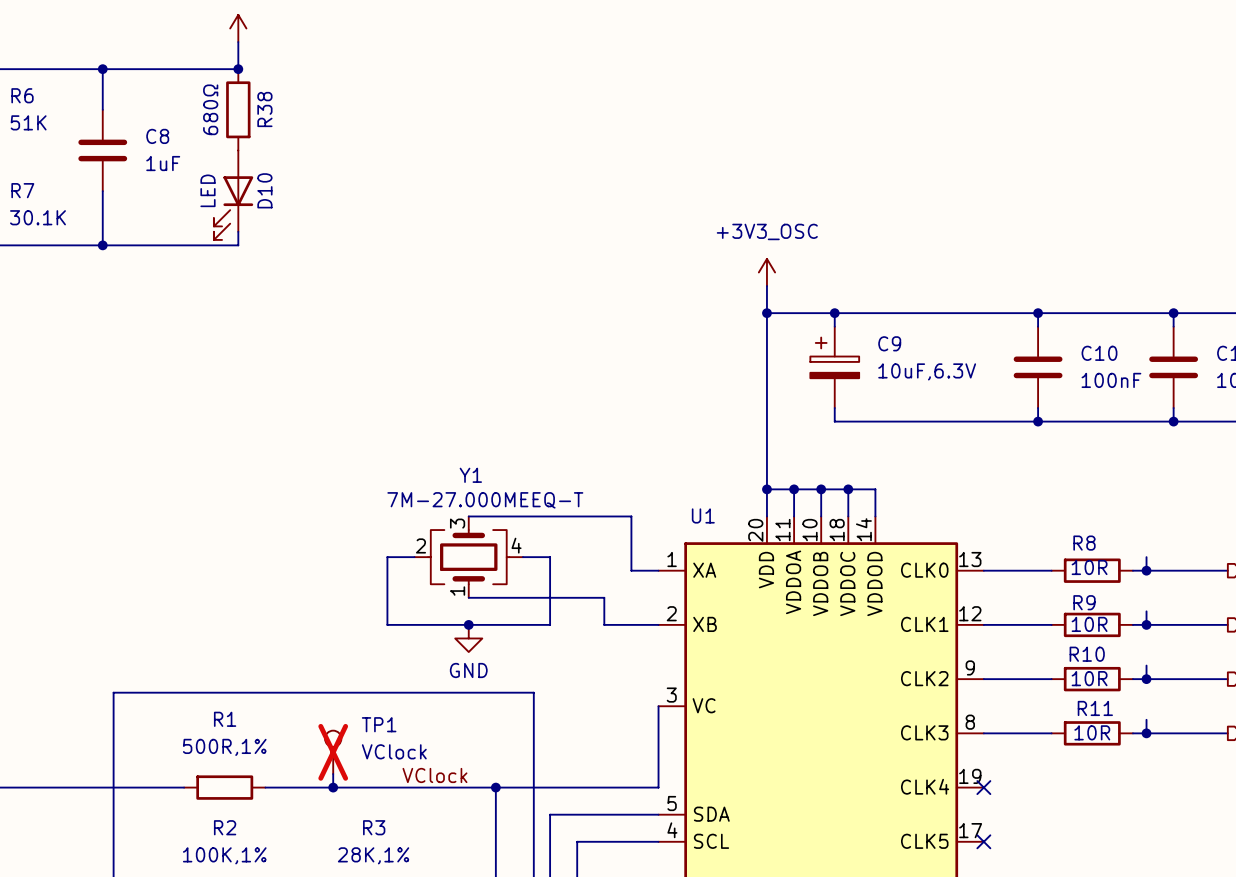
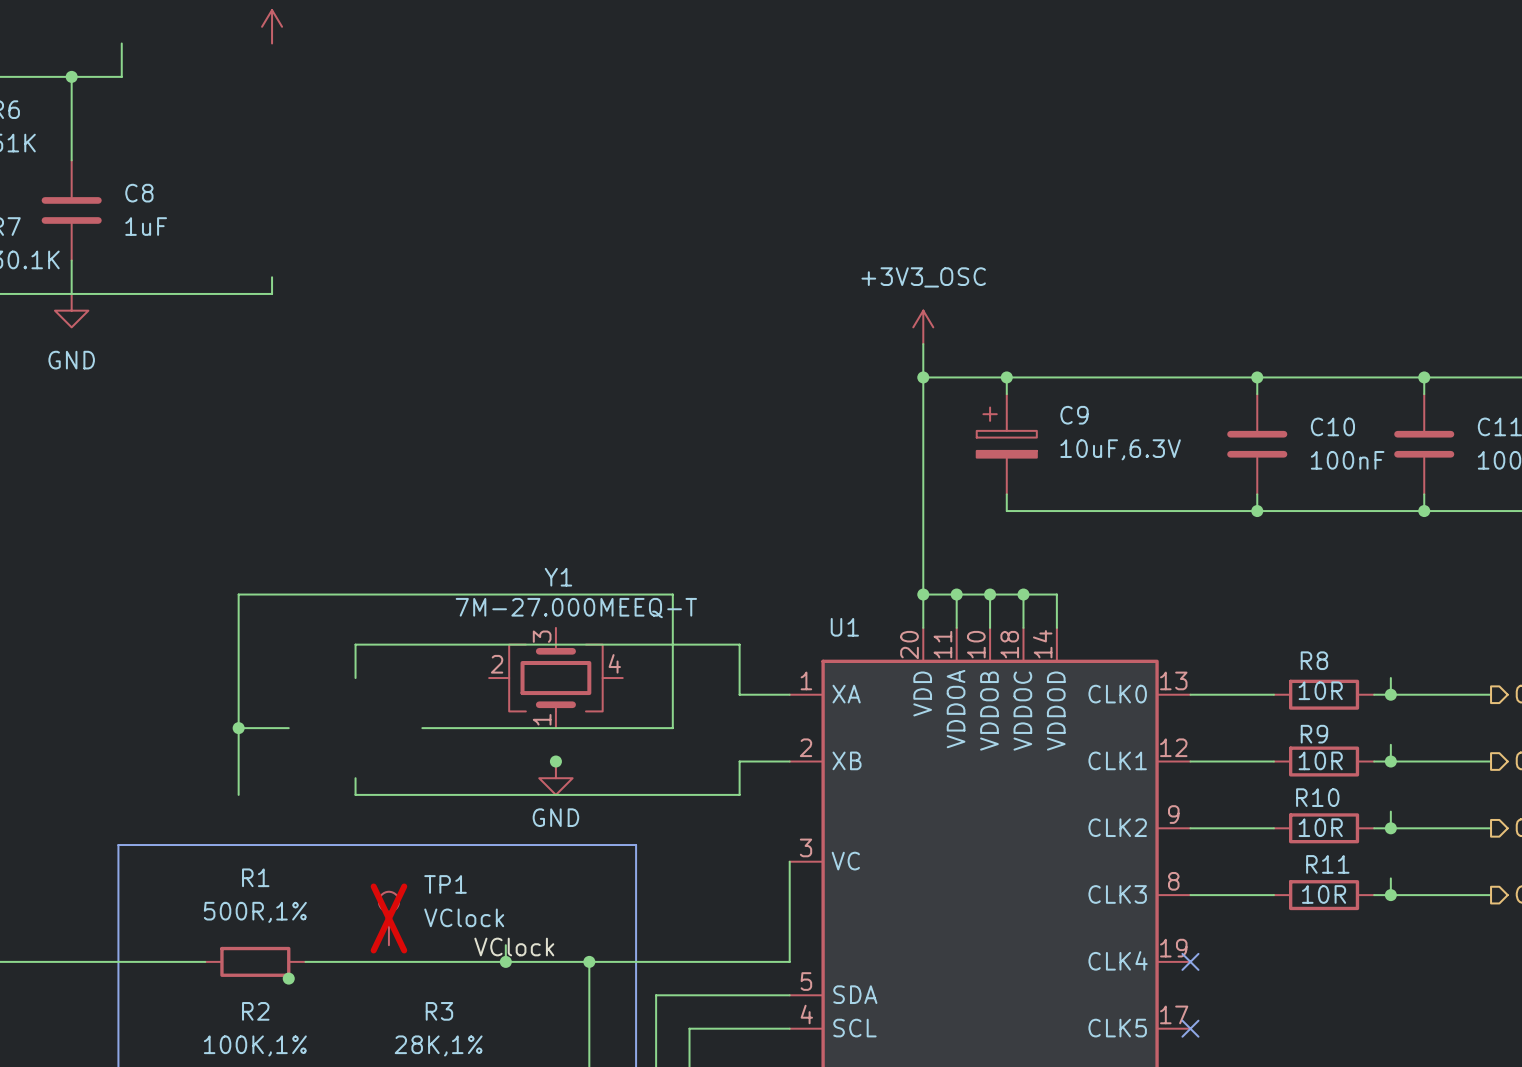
wire: (238, 42) (238, 69) (116, 69) -> (121, 43) (121, 76)
wire: none -> (71, 76) (71, 160)
wire: (102, 69) (102, 109) -> none
junction position: (102, 69) -> (71, 76)
junction: (238, 69) -> none
R38: 680Ω (238, 109) -> none
C8 position: (102, 150) -> (71, 210)
wire: (102, 191) (102, 245) -> none
D10: LED (233, 195) -> none
wire: none -> (71, 260) (71, 293)
junction: (102, 245) -> none
power symbol: none -> GND (71, 310)
wire: (468, 516) (631, 516) (631, 570) -> (355, 678) (355, 644) (739, 644) (739, 694) (756, 694)
wire: (414, 557) (387, 557) (387, 624) (550, 624) (550, 557) (522, 557) -> none
wire: none -> (238, 728) (288, 728)
junction: none -> (238, 728)
wire: none -> (422, 728) (555, 728)
wire: (563, 597) (604, 597) (604, 624) (617, 624) -> (355, 778) (355, 794) (739, 794) (739, 761)
wire: none -> (672, 728) (672, 594) (238, 594) (238, 794)
wire: (333, 774) (333, 787) -> (505, 945) (505, 961)
junction: (333, 787) -> none
junction: none -> (505, 961)
junction: none -> (288, 978)

